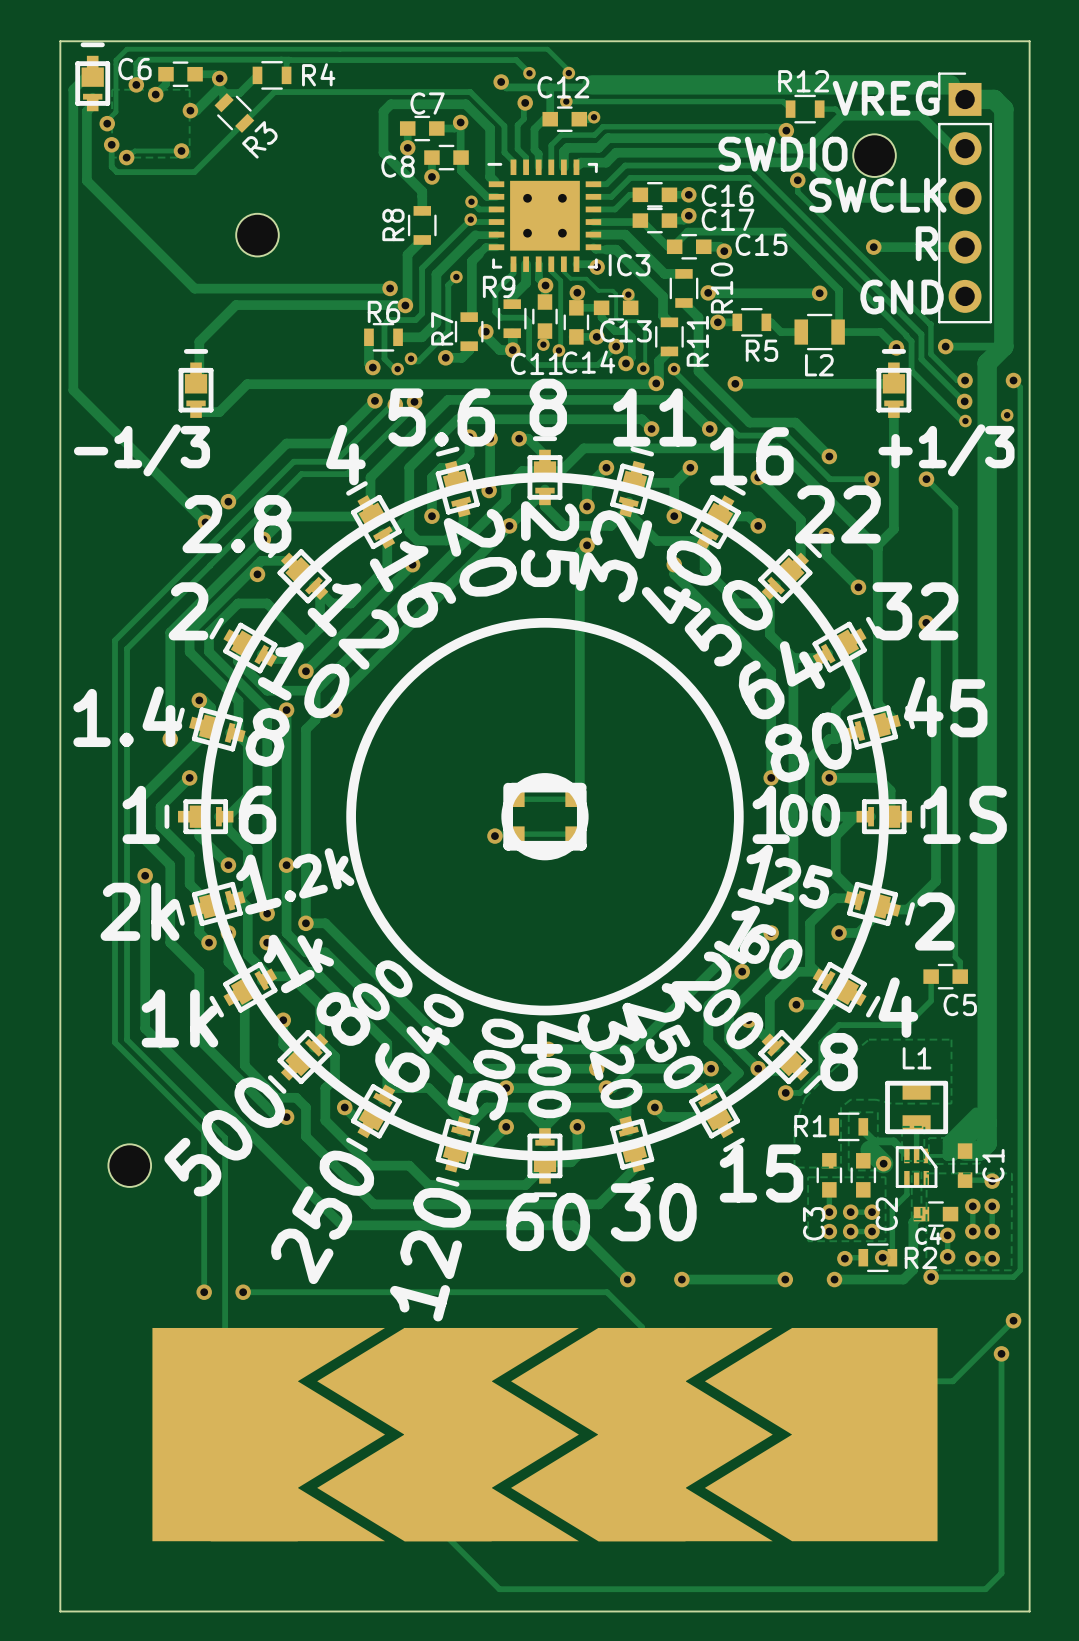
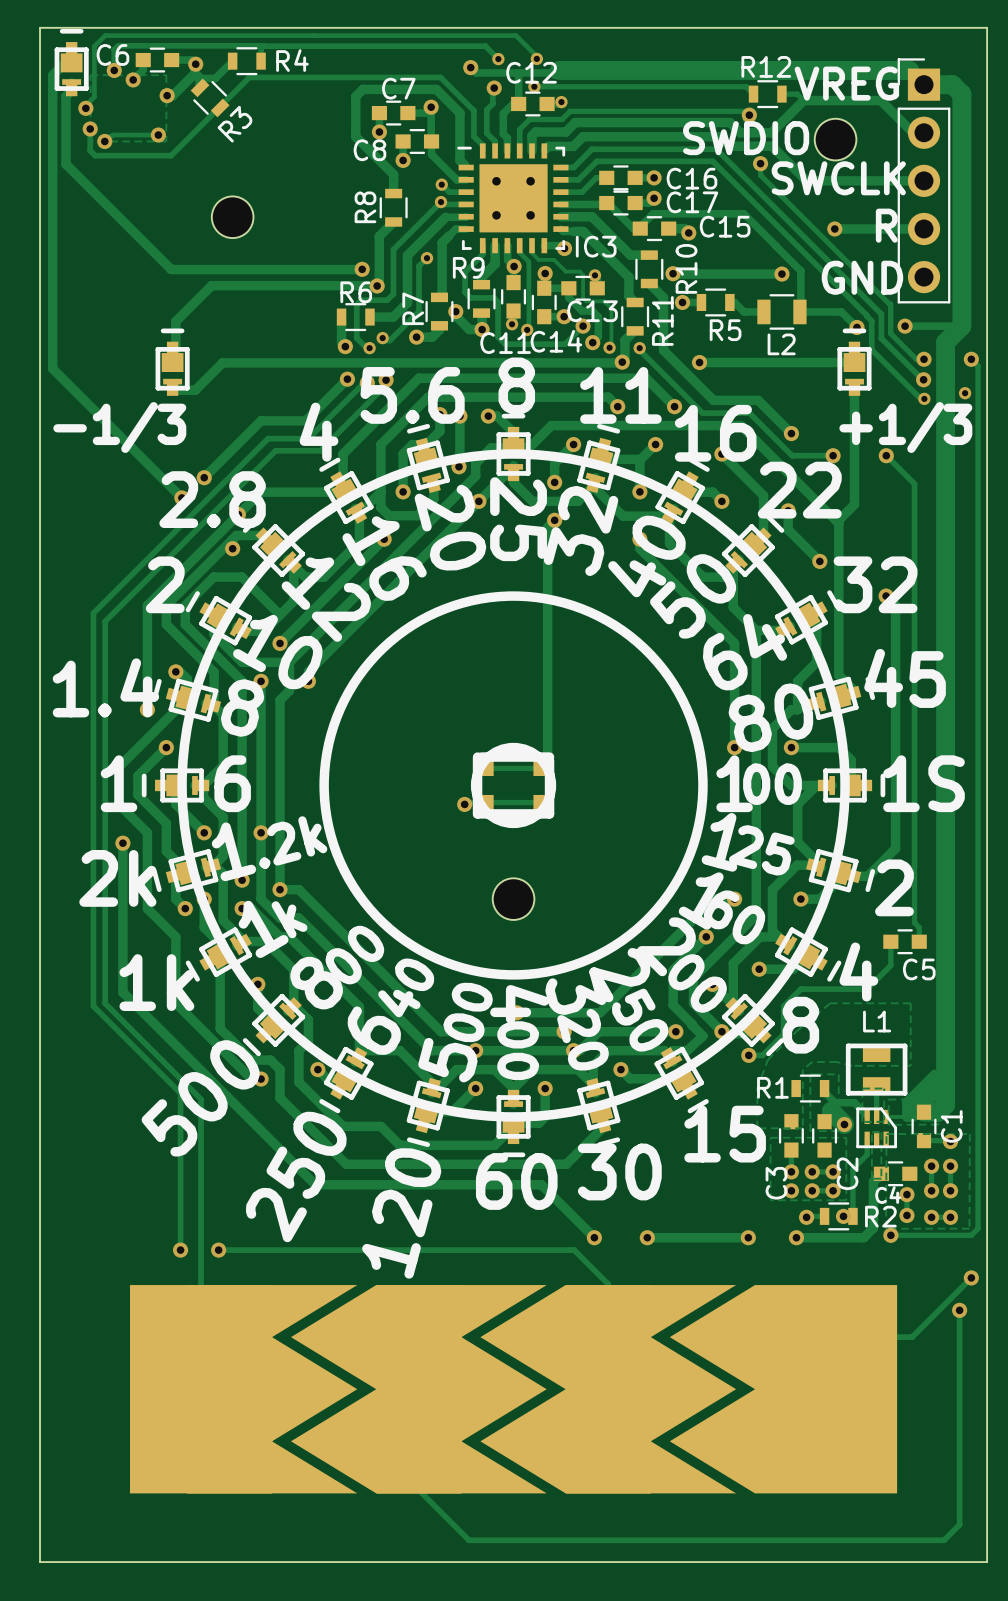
part position: (129, 1165) -> (513, 899)

